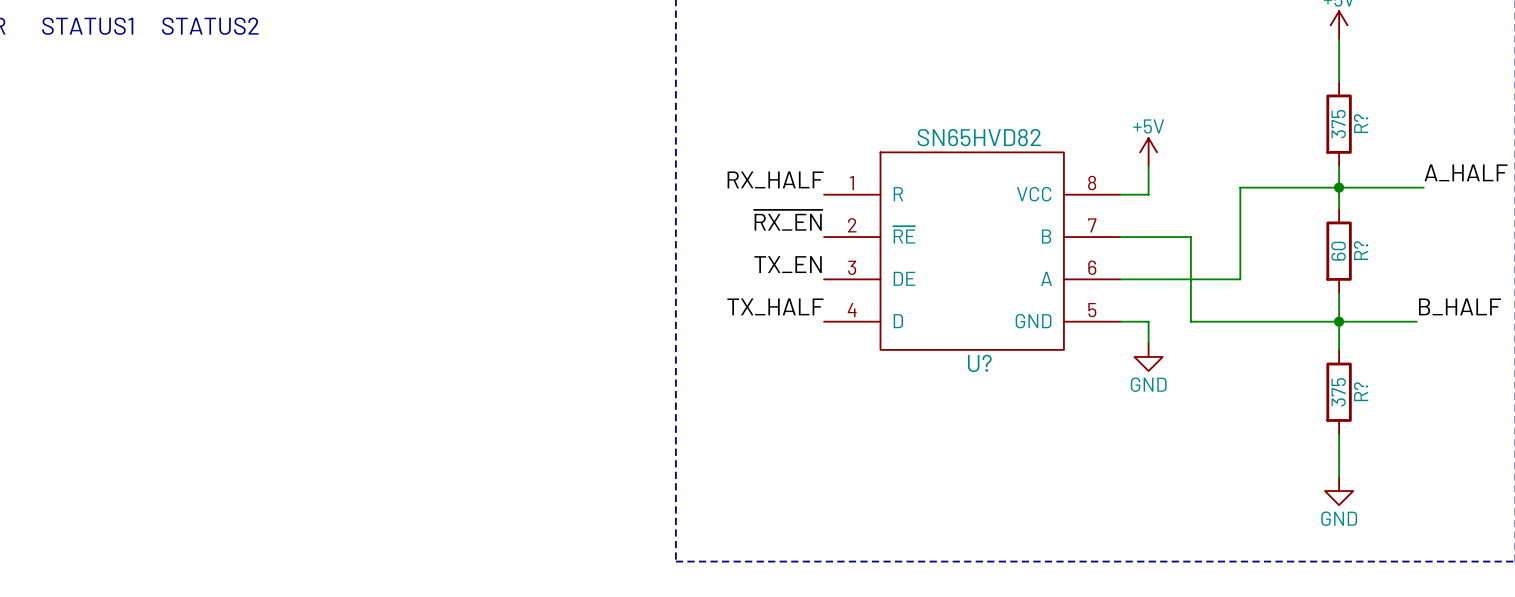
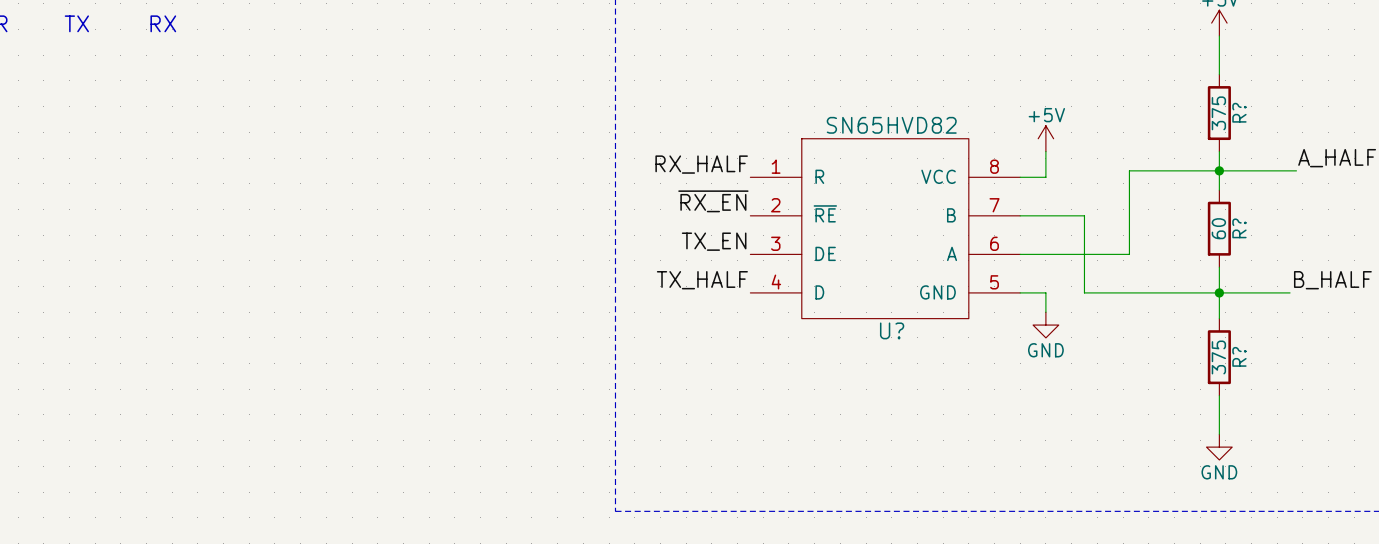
text: none -> TX (76, 23)
text: STATUS1 (87, 26) -> none
text: STATUS2 (210, 26) -> RX (163, 23)

